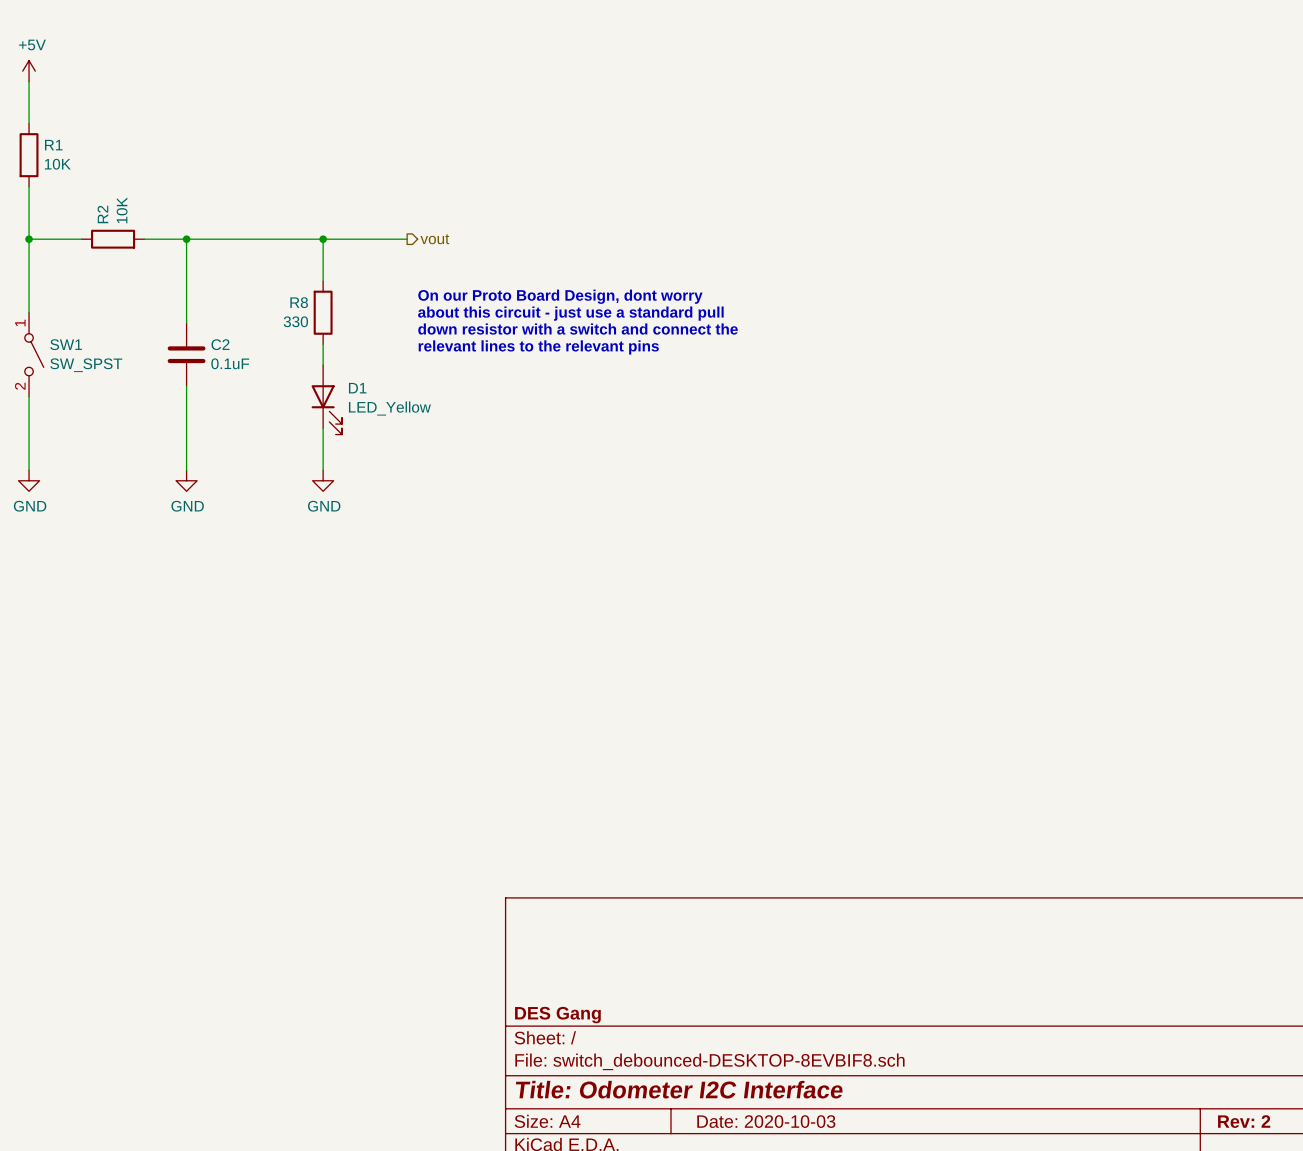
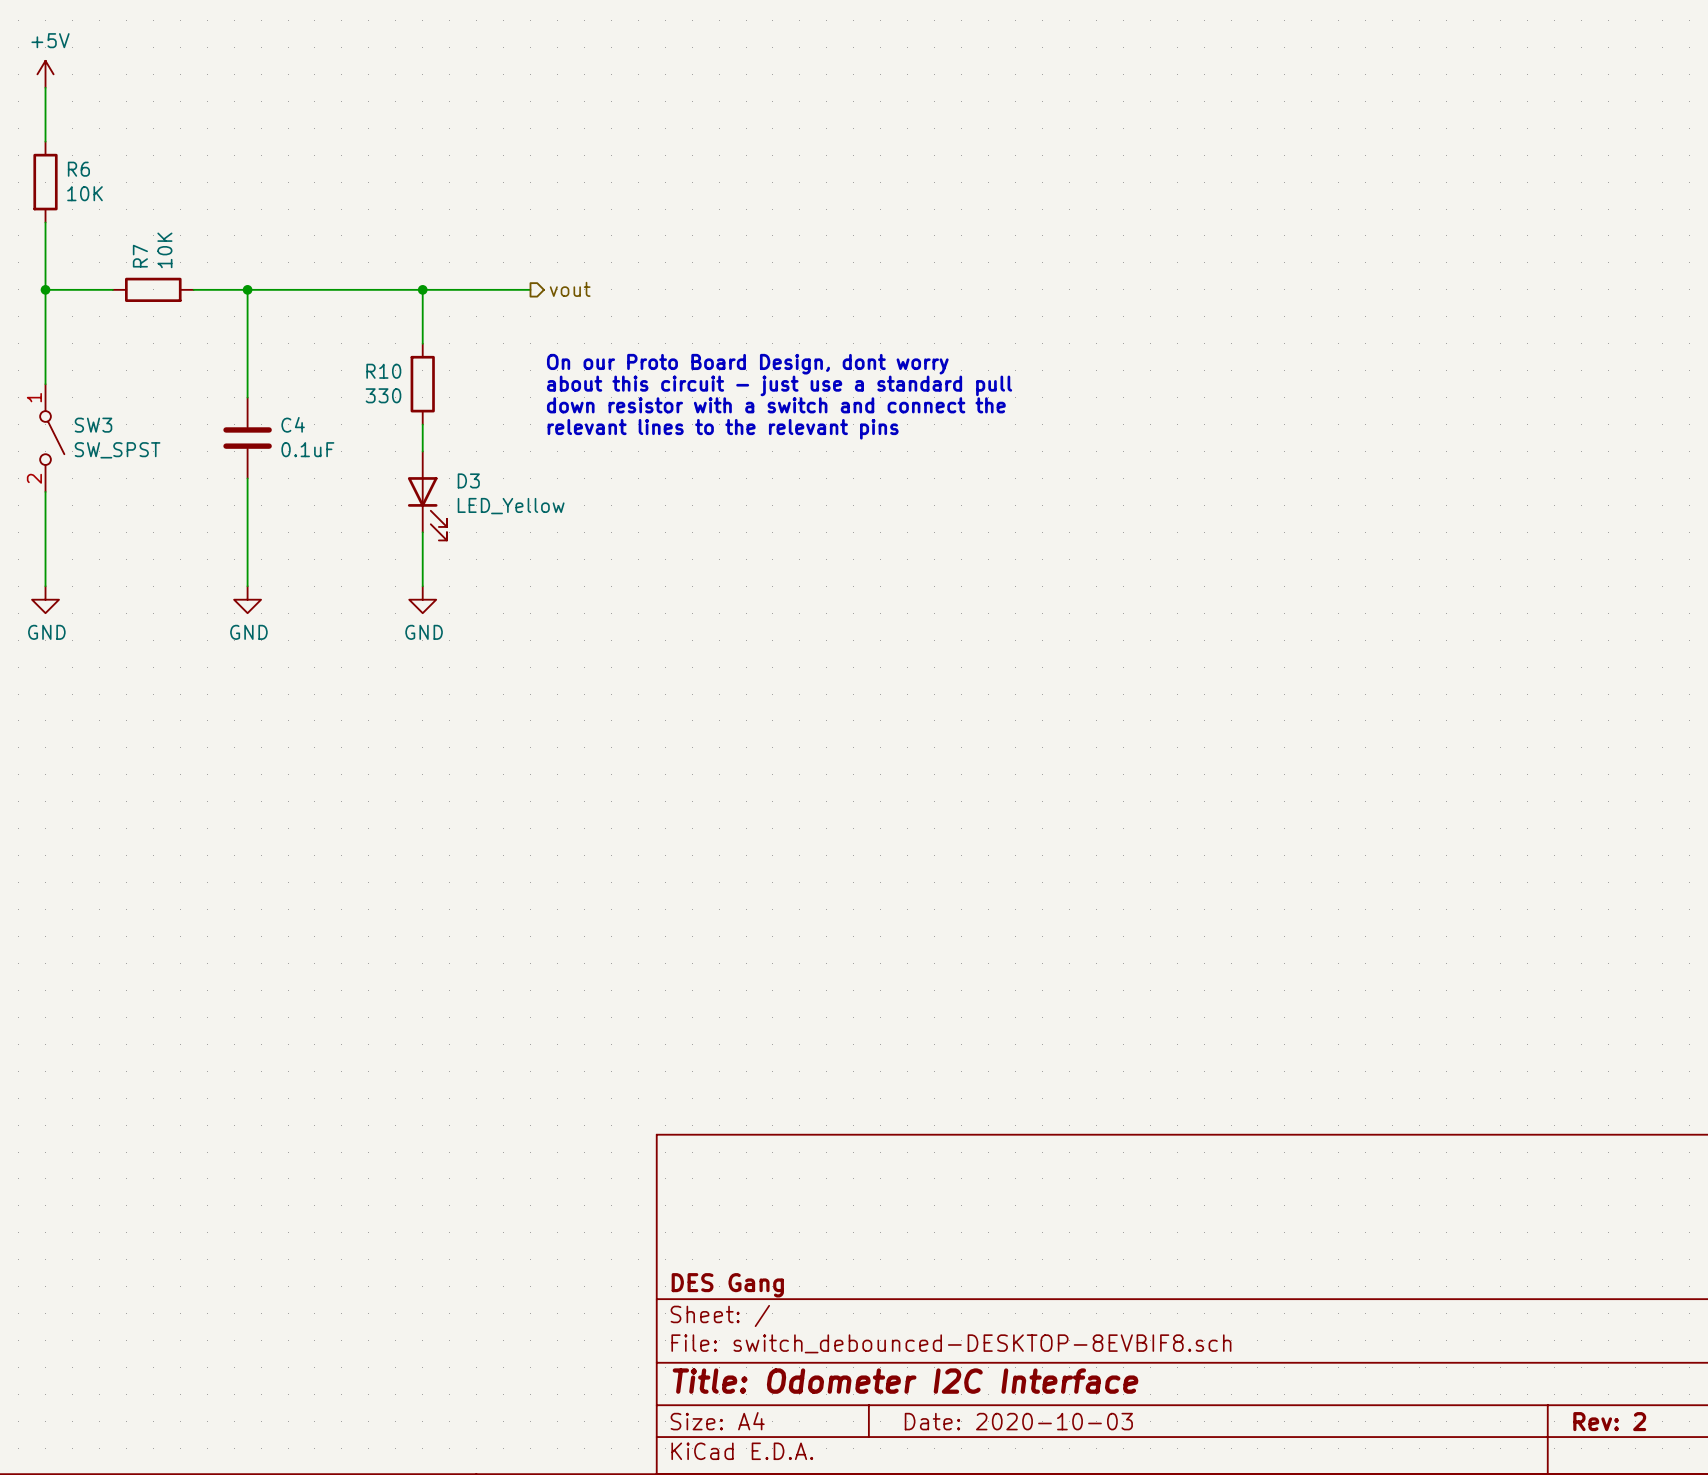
R1 name: R1 (53, 145) -> R6 (78, 169)
R2 name: R2 (102, 214) -> R7 (140, 256)
R8 name: R8 (299, 302) -> R10 (383, 371)
SW1 name: SW1 (66, 344) -> SW3 (93, 425)
C2 name: C2 (220, 344) -> C4 (293, 424)
D1 name: D1 (357, 388) -> D3 (468, 480)

